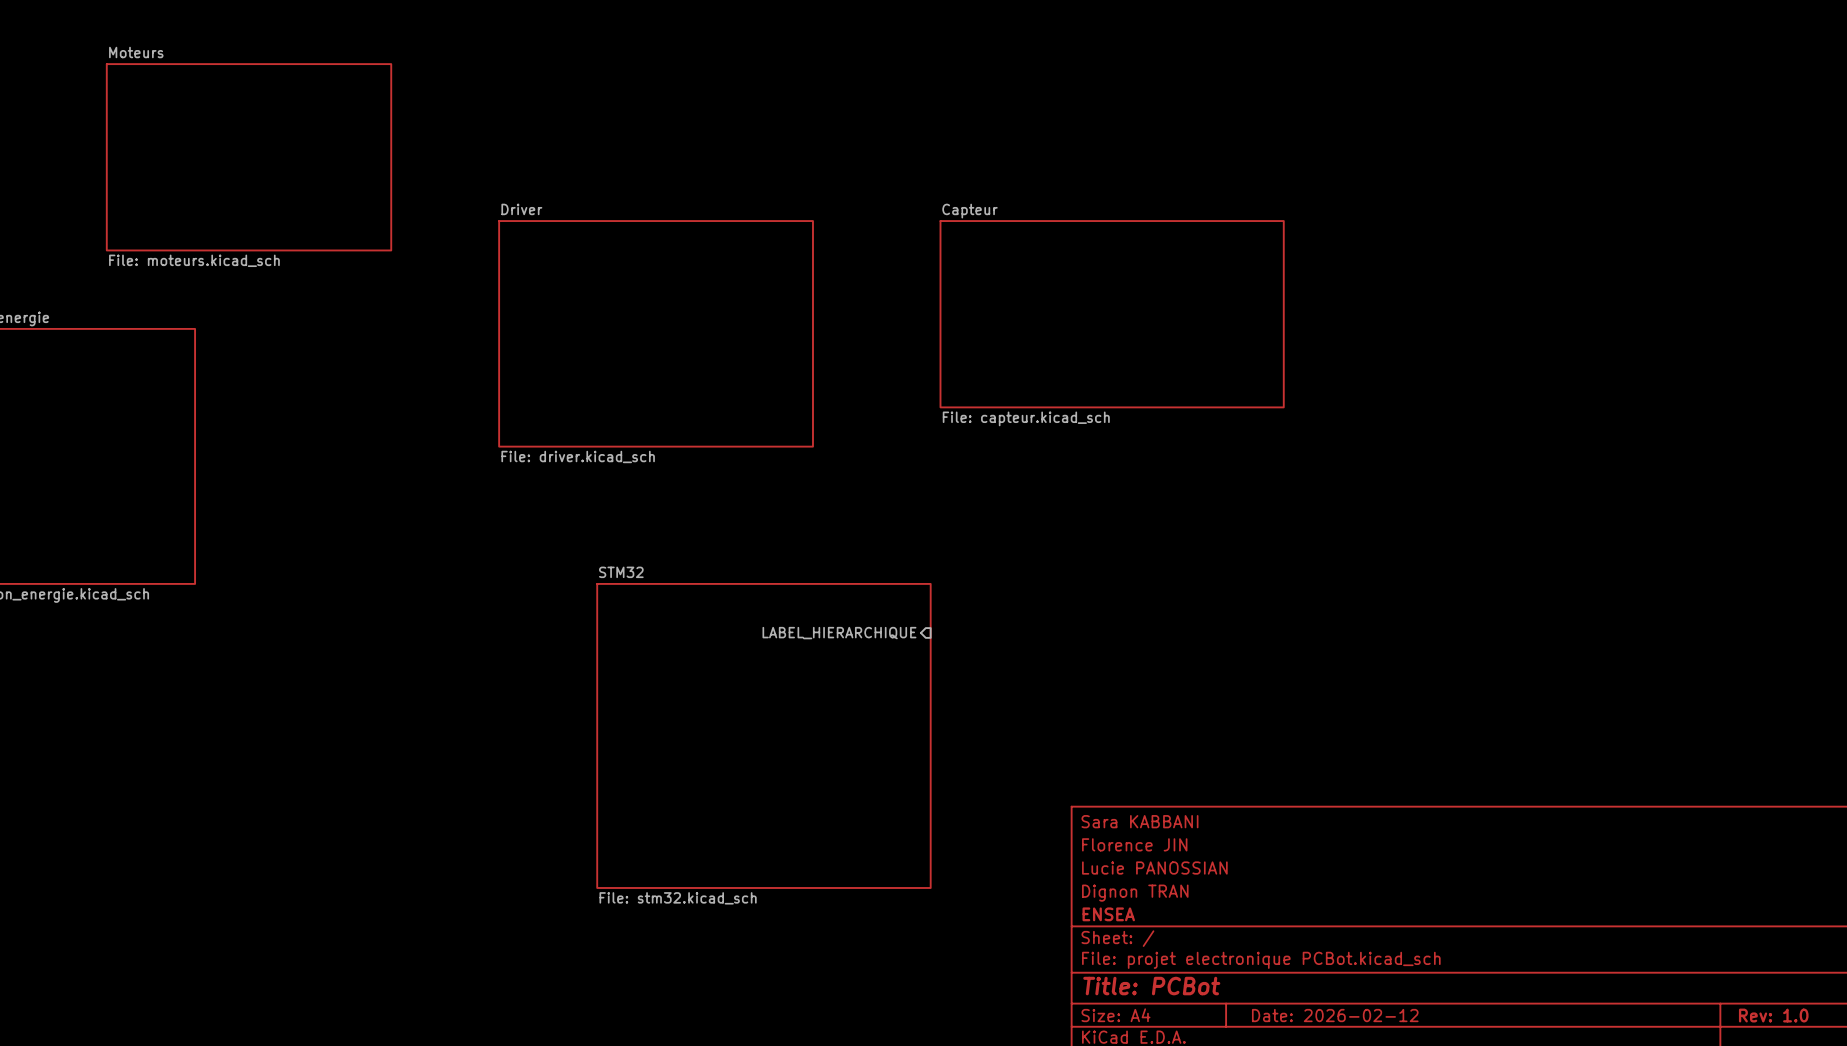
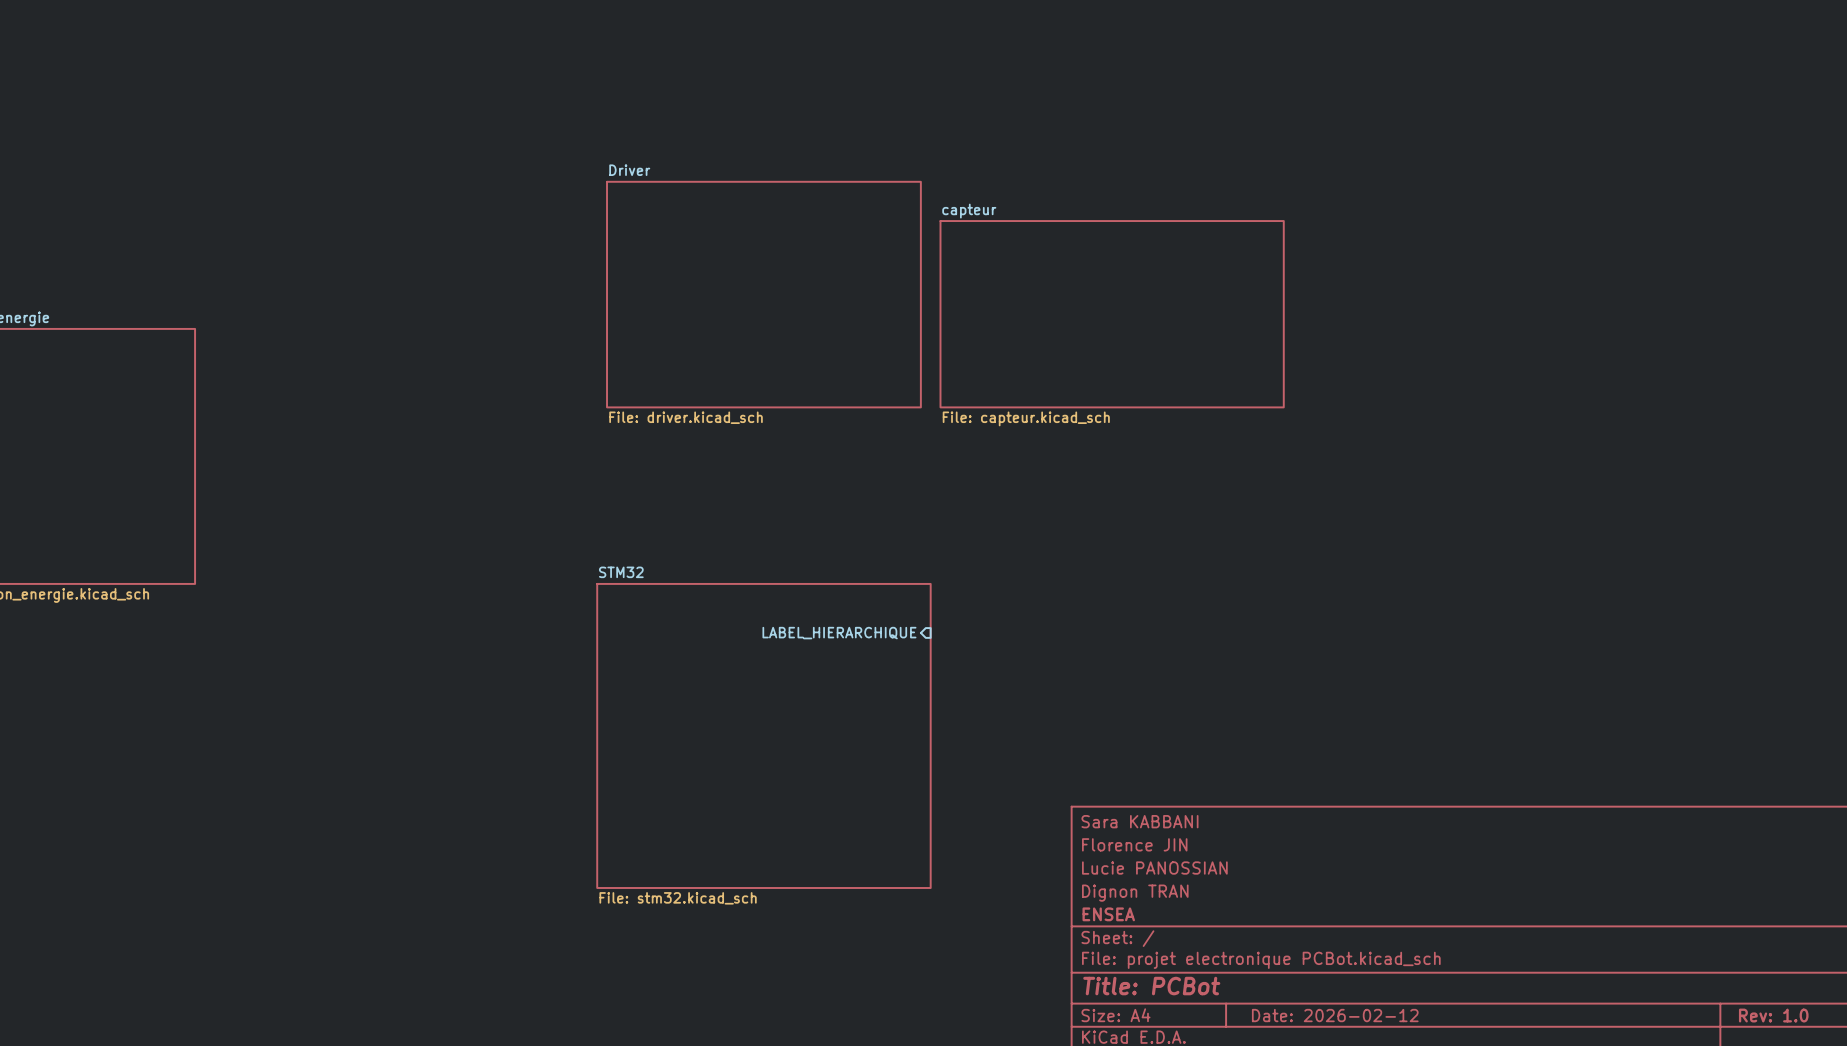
sheet Moteurs: File: moteurs.kicad_sch (249, 157) -> none
sheet Capteur name: Capteur (969, 211) -> capteur (969, 211)
sheet Driver position: (656, 333) -> (763, 294)

